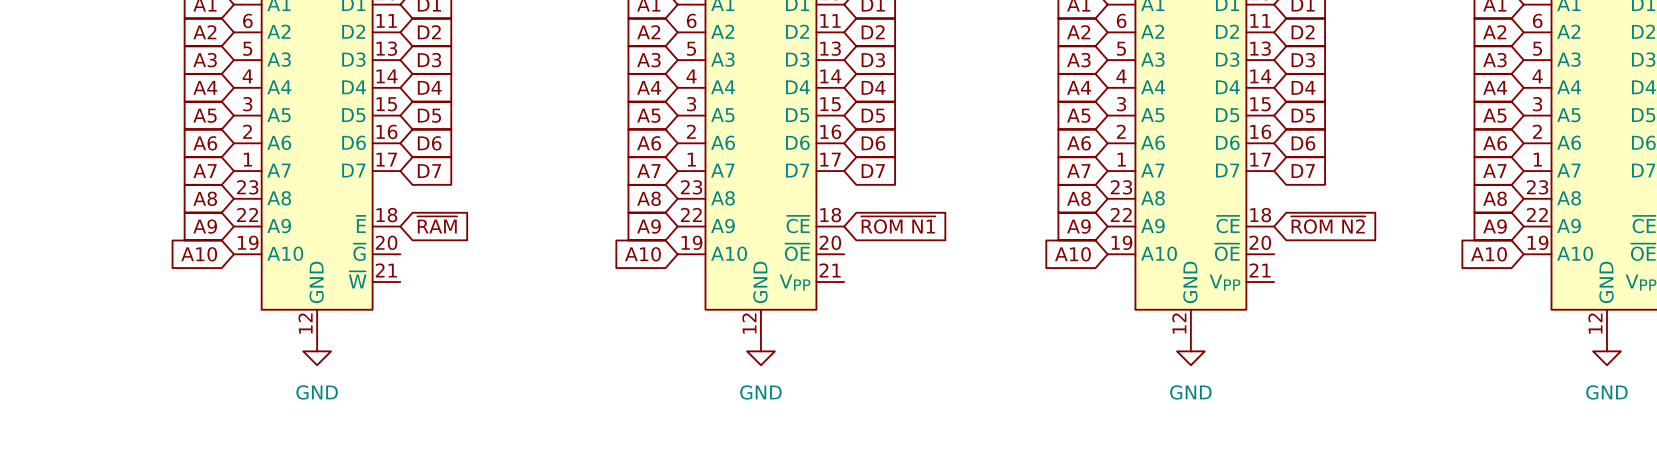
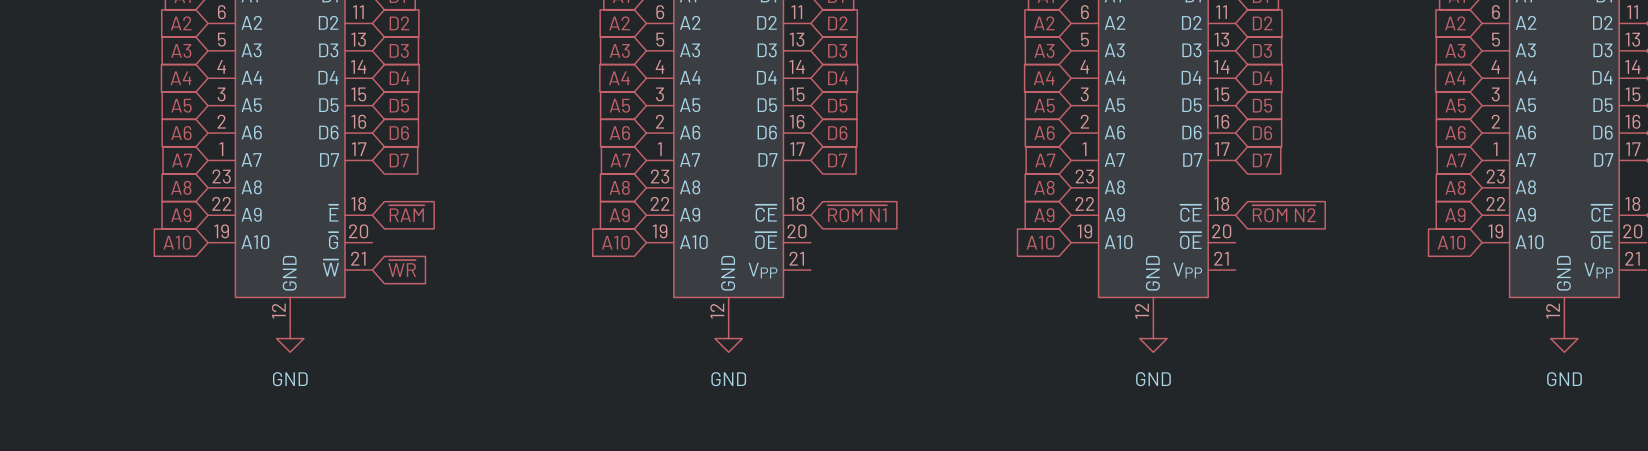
global label: none -> ~{WR} (402, 268)

